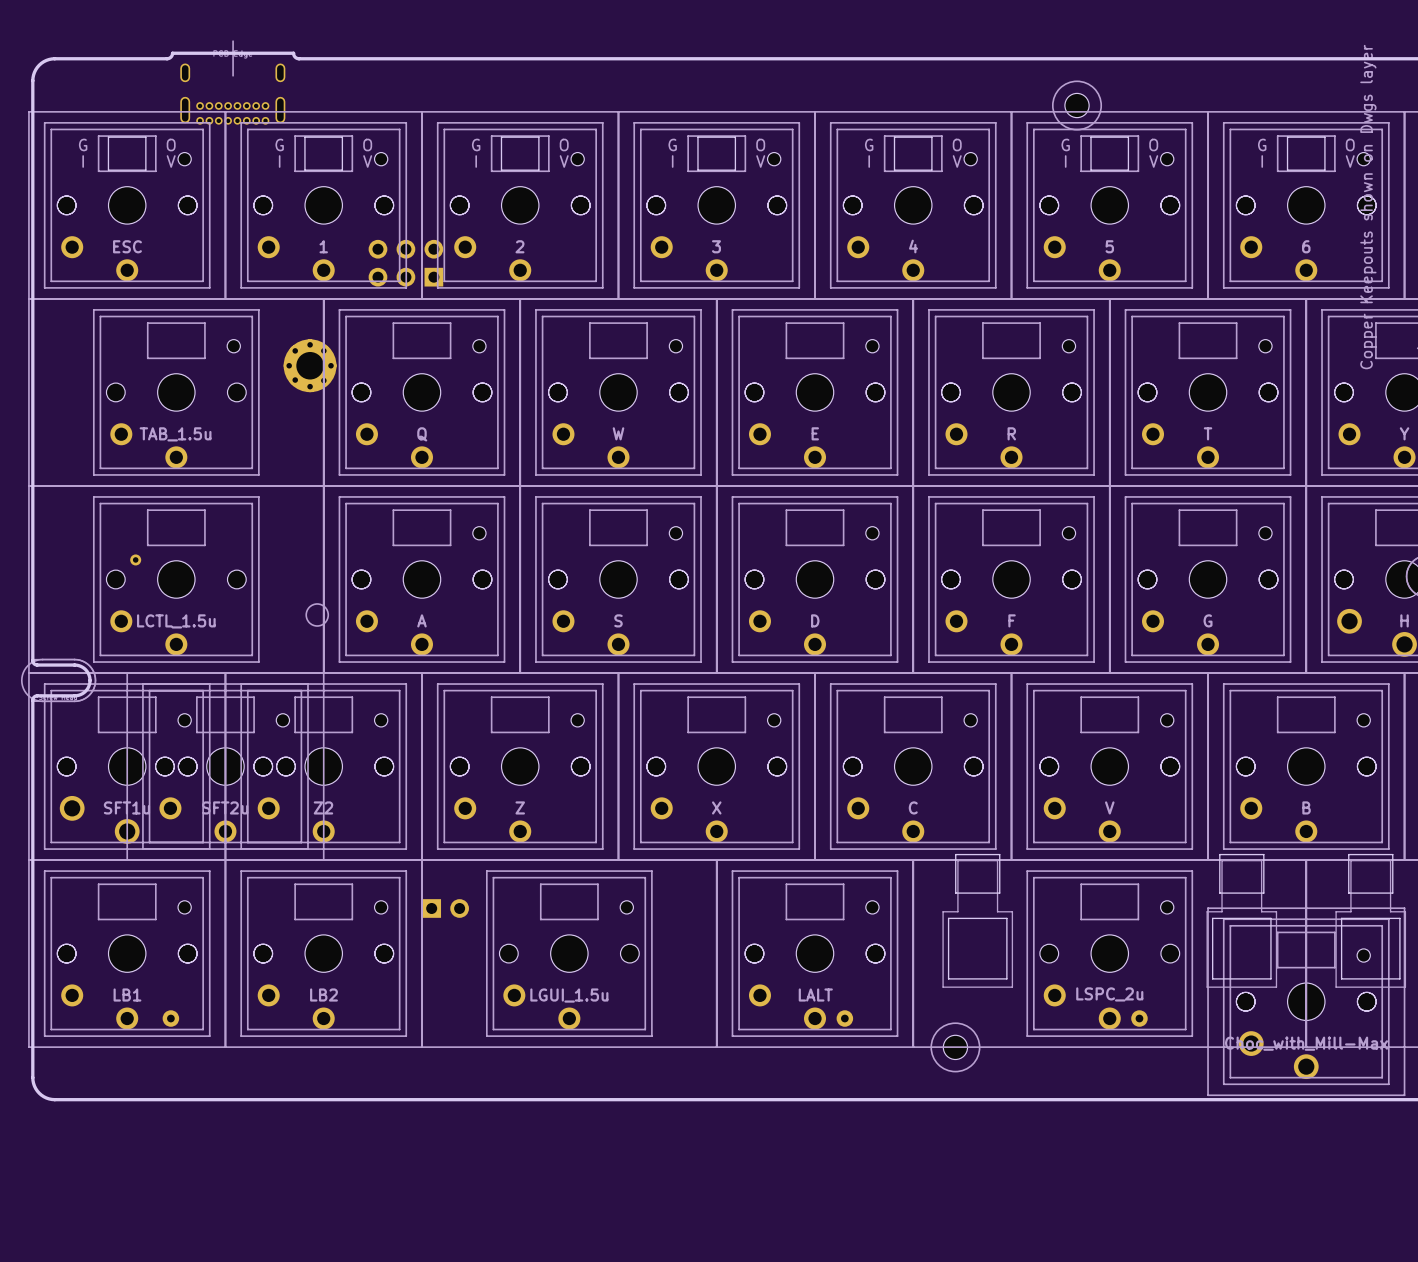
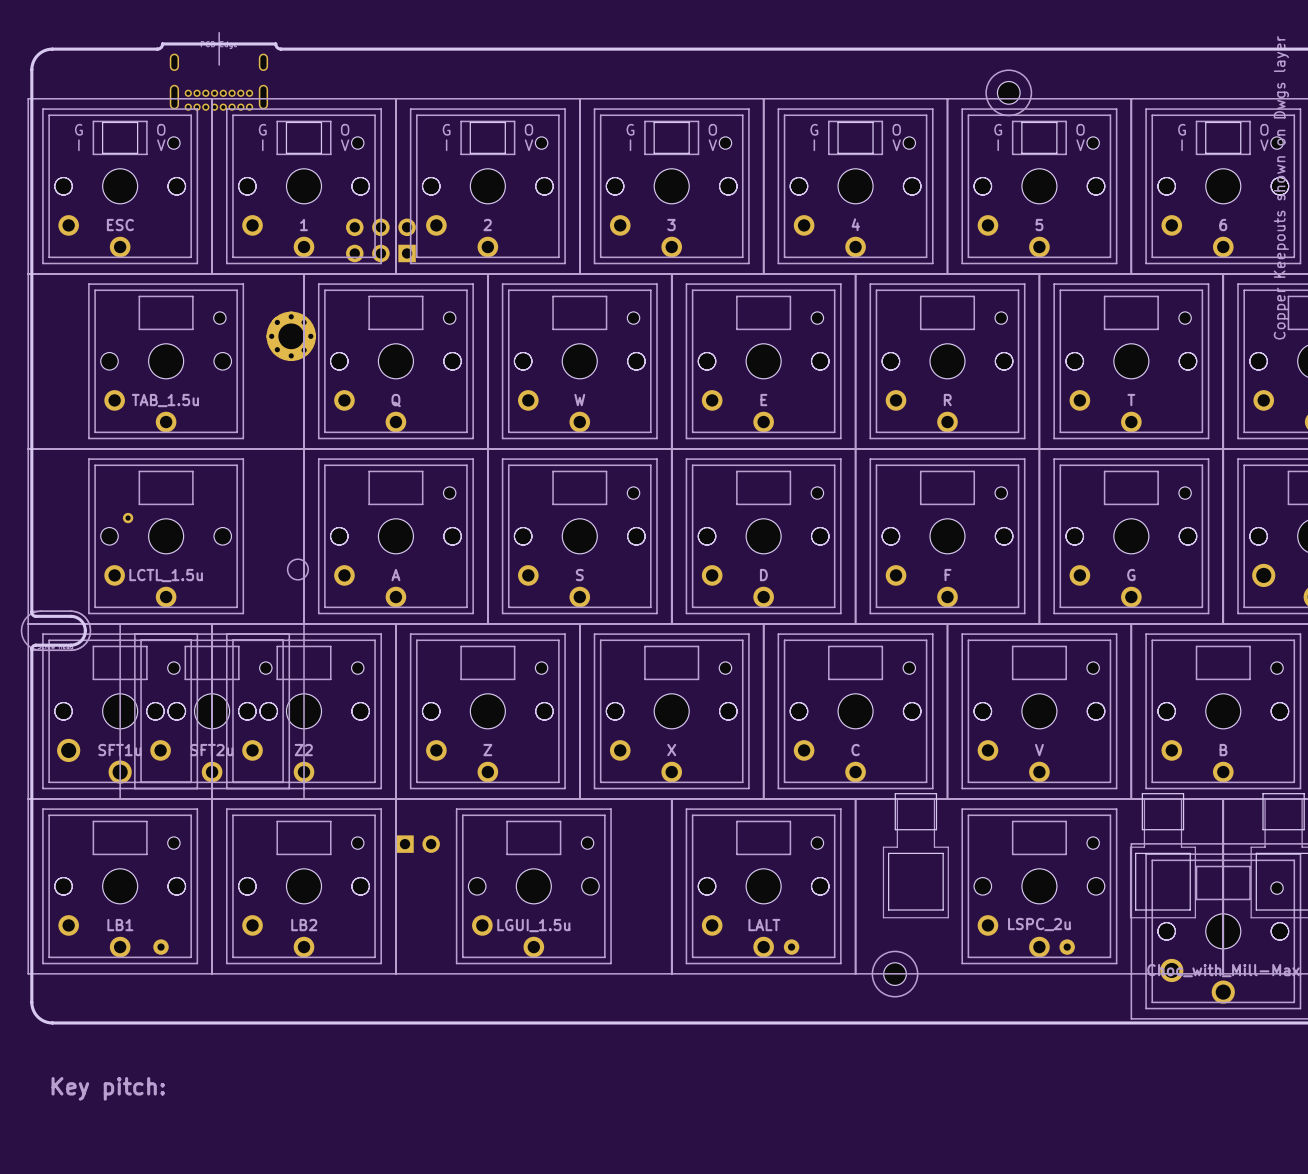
text: none -> Key pitch: (108, 1088)

